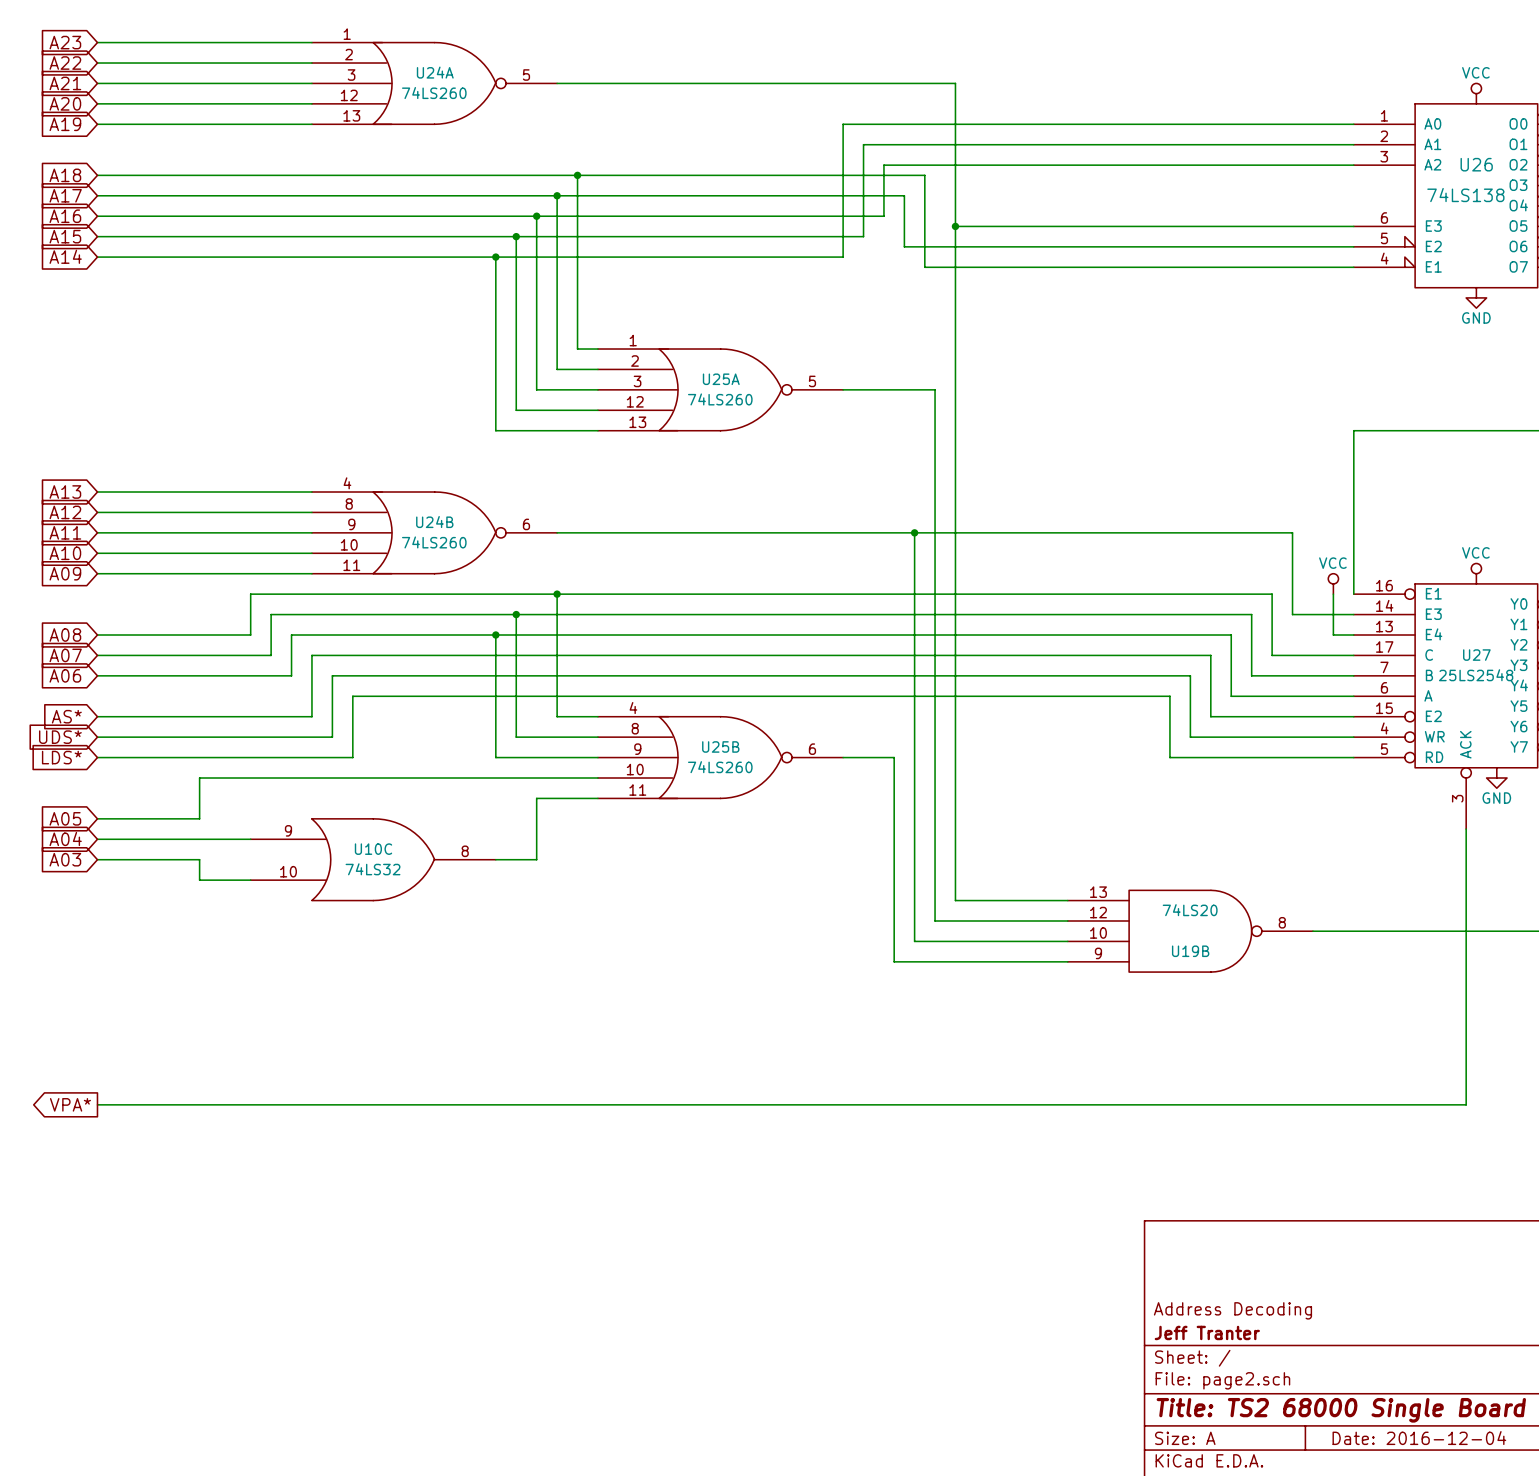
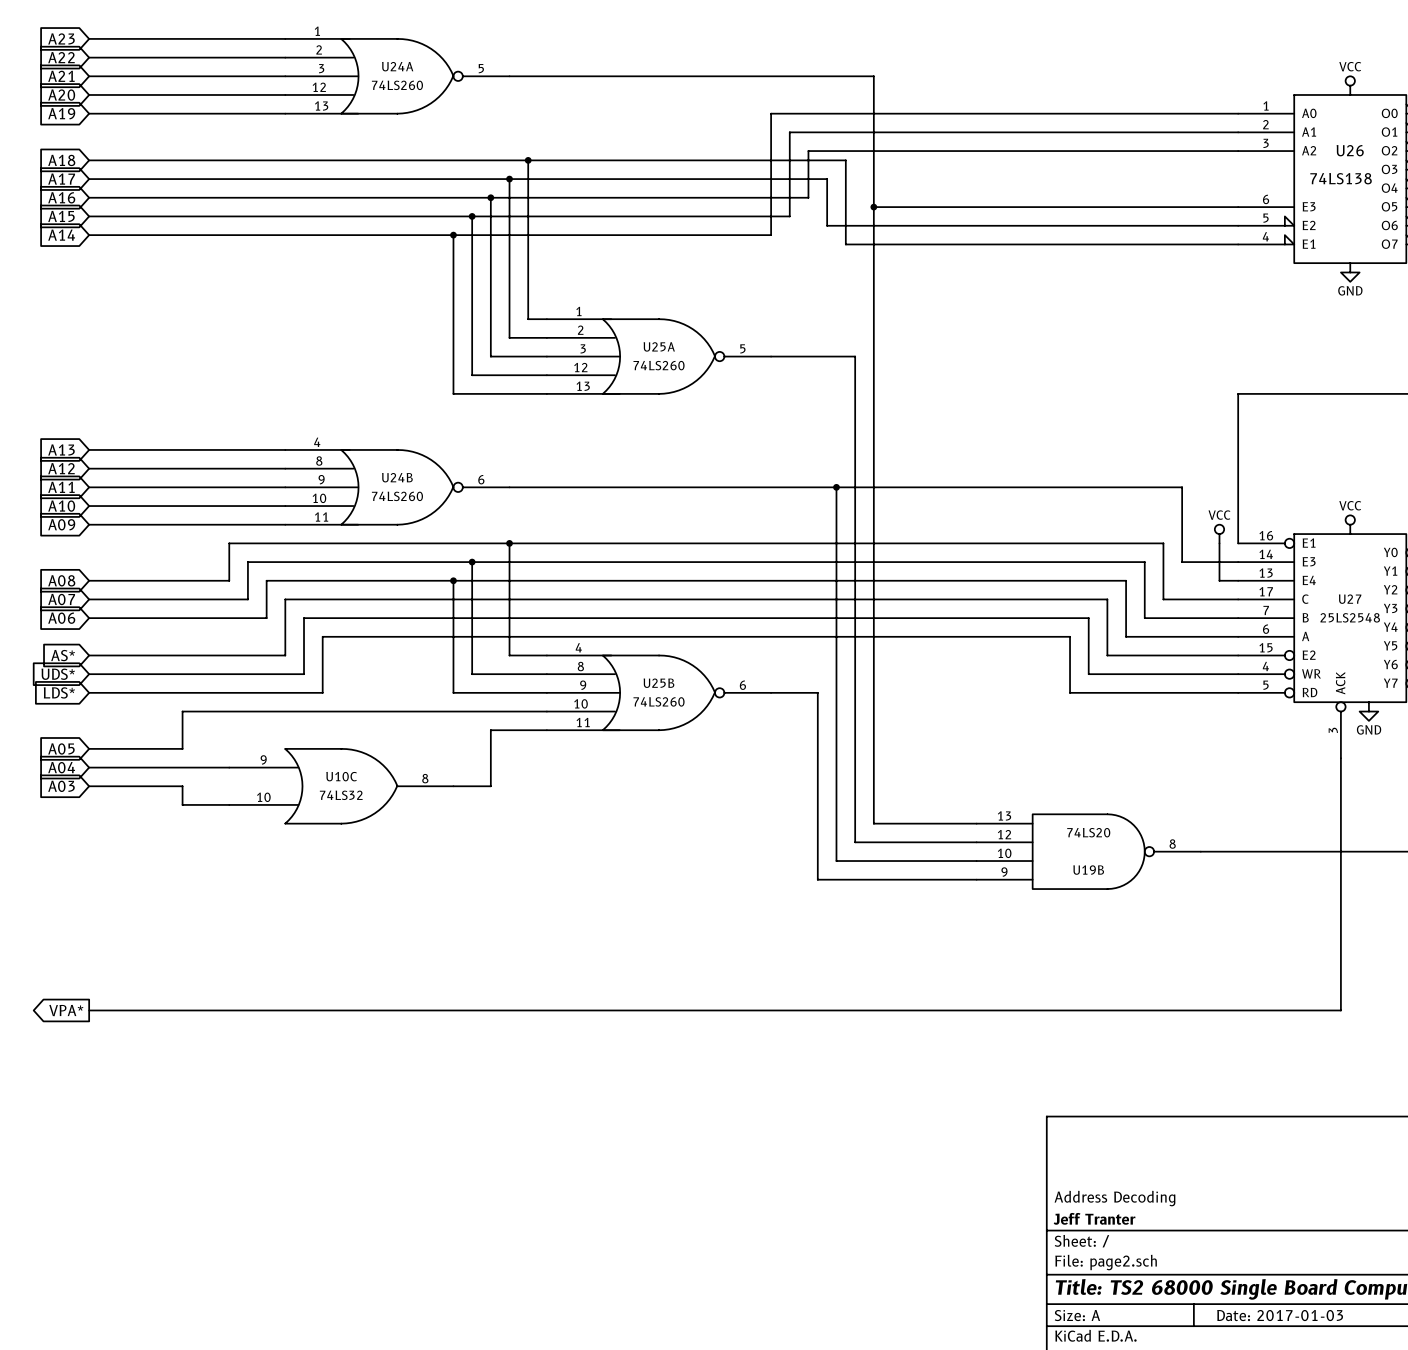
title block: Date: 2016-12-04 (1419, 1438) -> Date: 2017-01-03 (1280, 1315)

